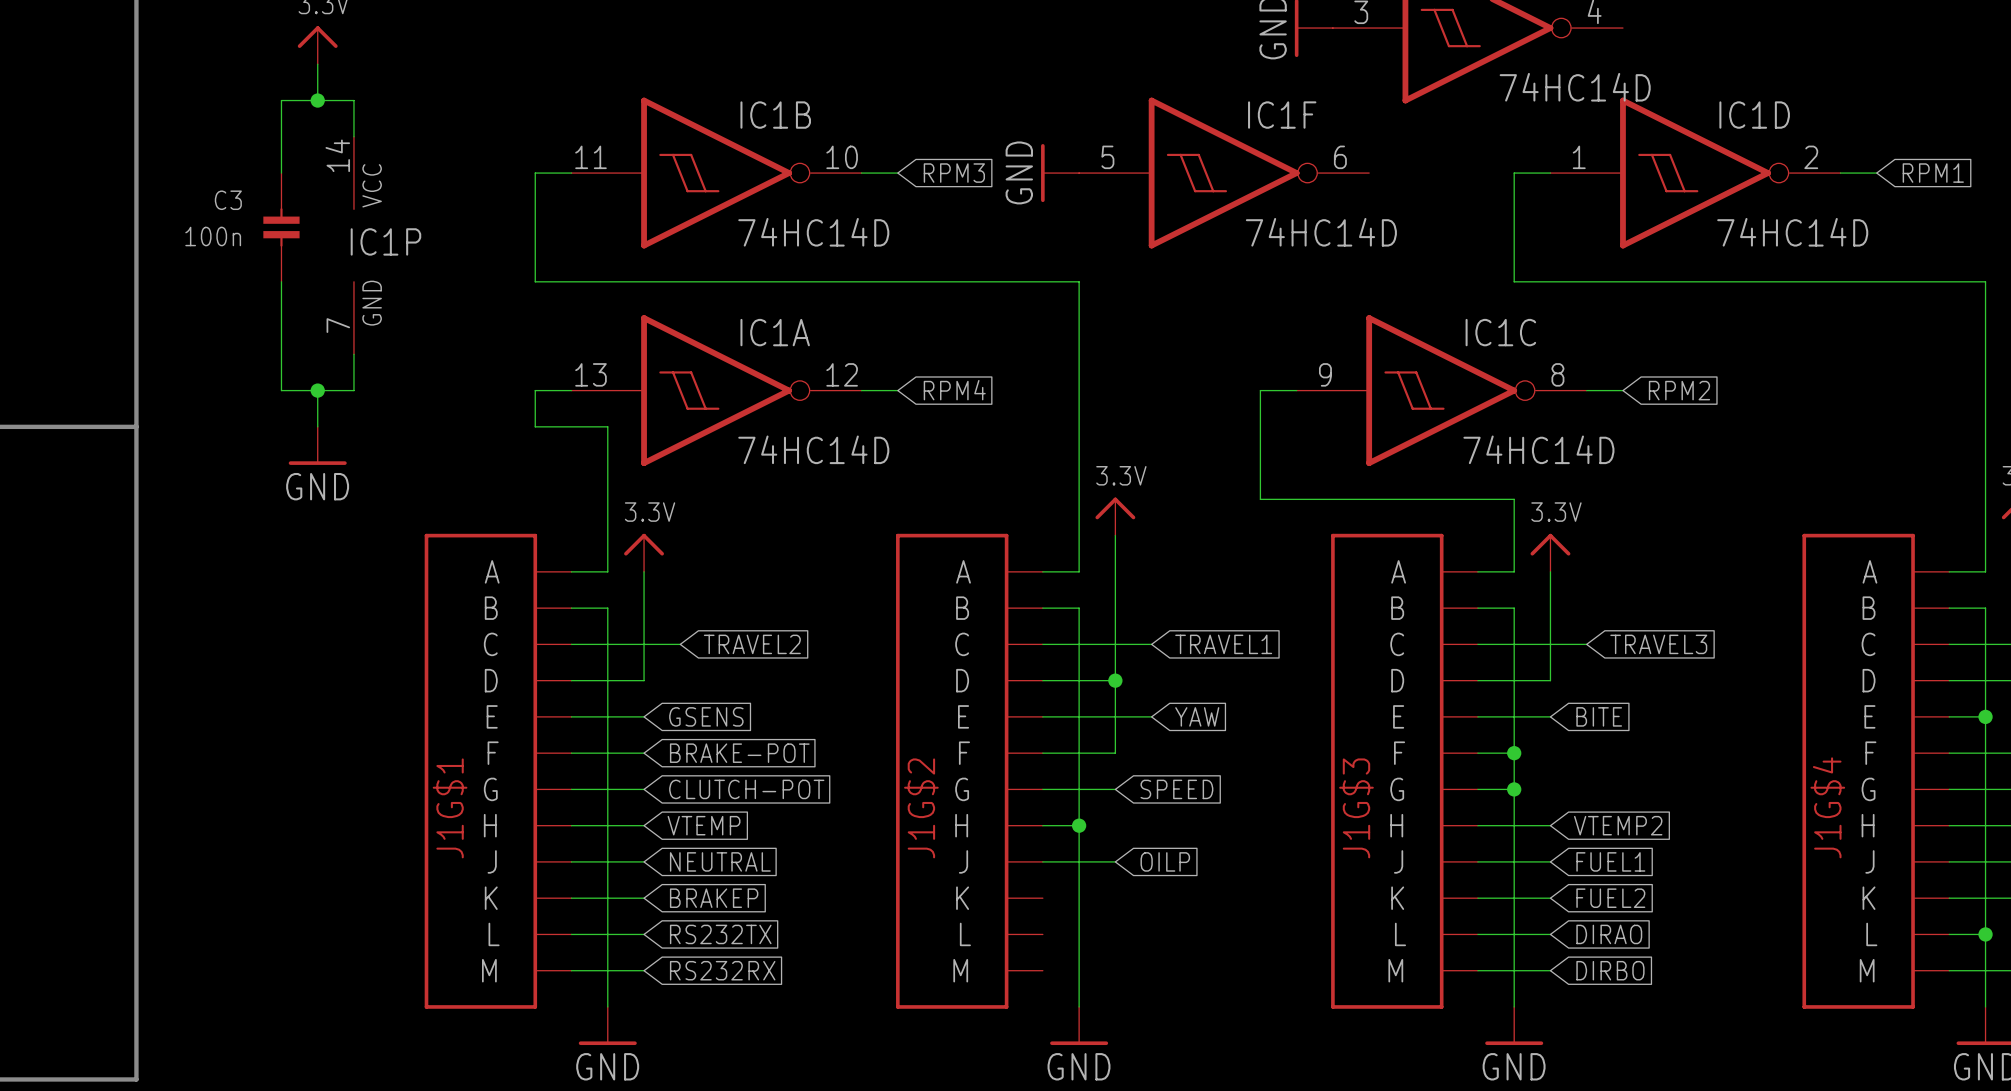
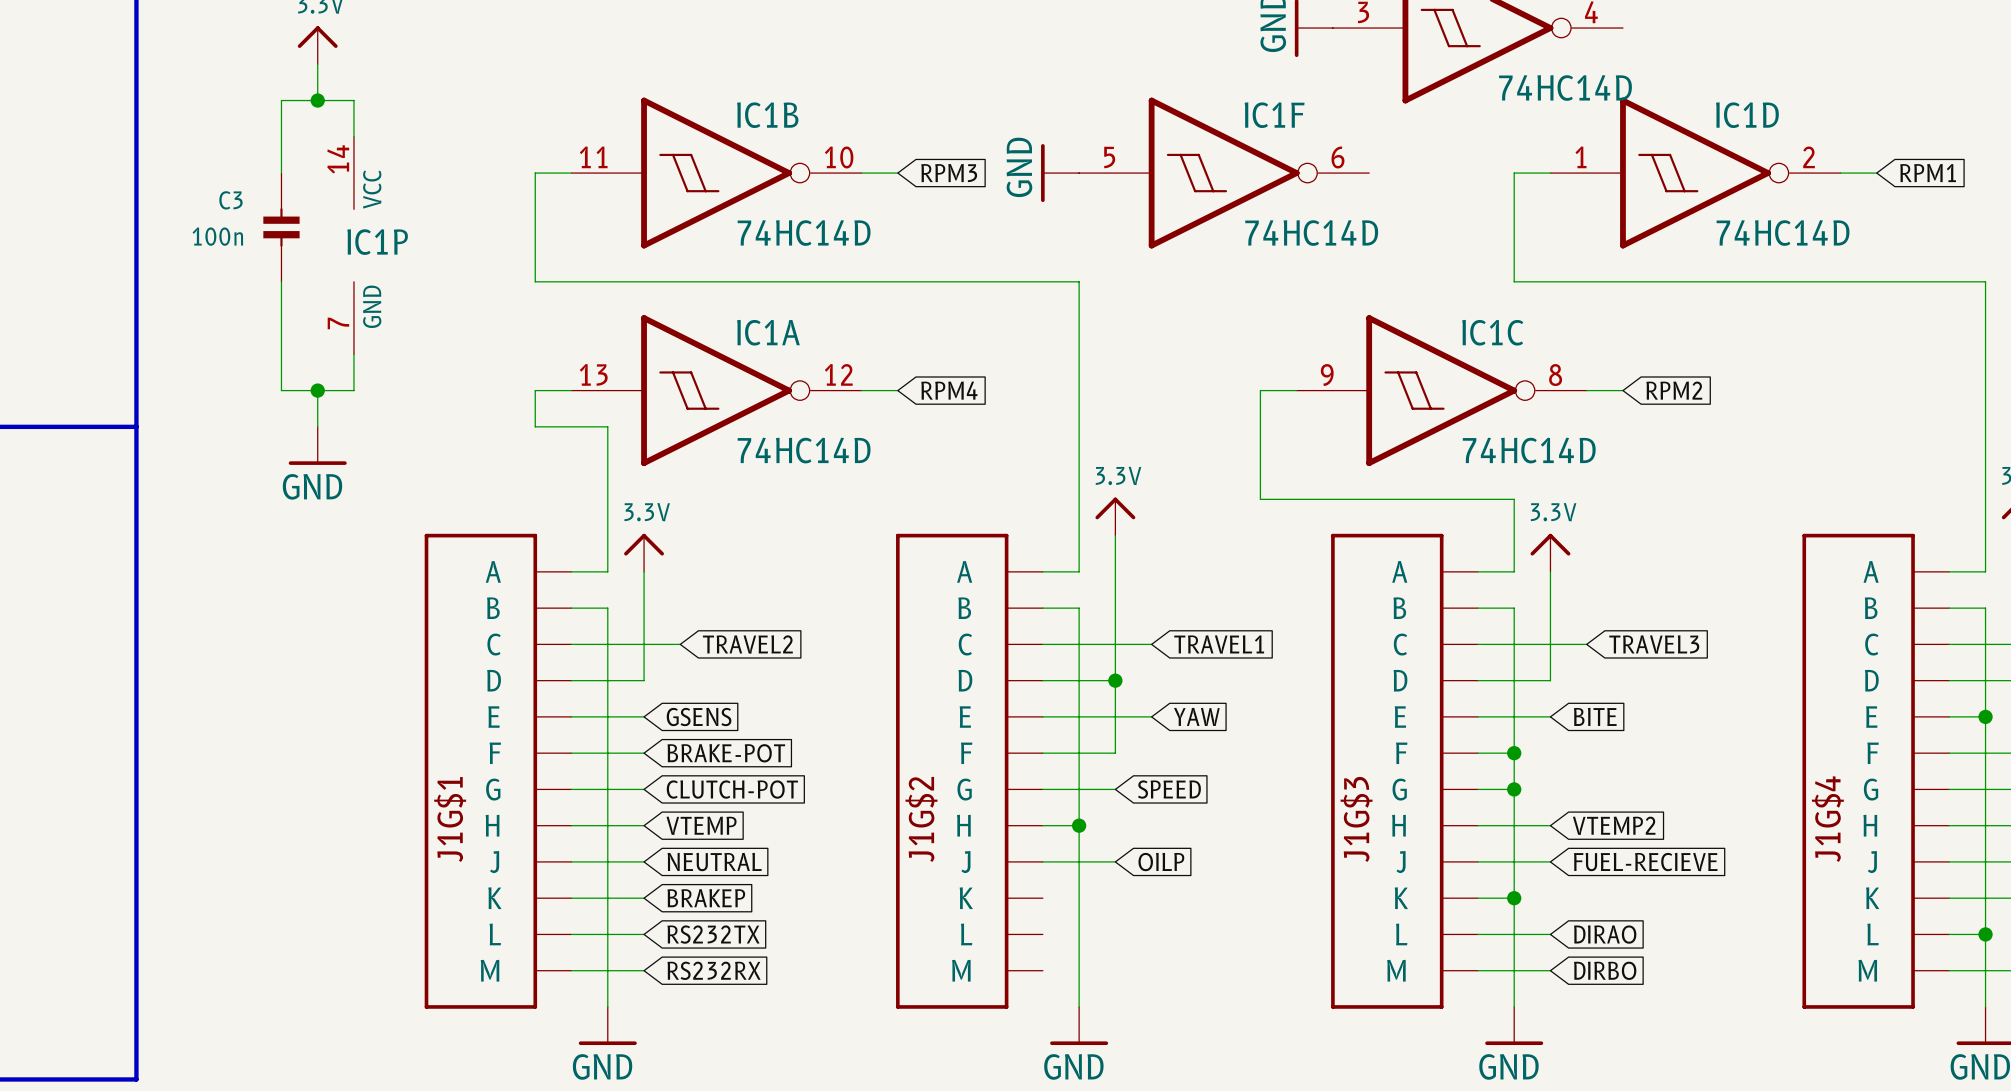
global label: FUEL1 (1610, 861) -> FUEL-RECIEVE (1645, 862)
wire: (1514, 898) (1550, 898) -> none
junction: none -> (1514, 898)
global label: FUEL2 (1610, 898) -> none

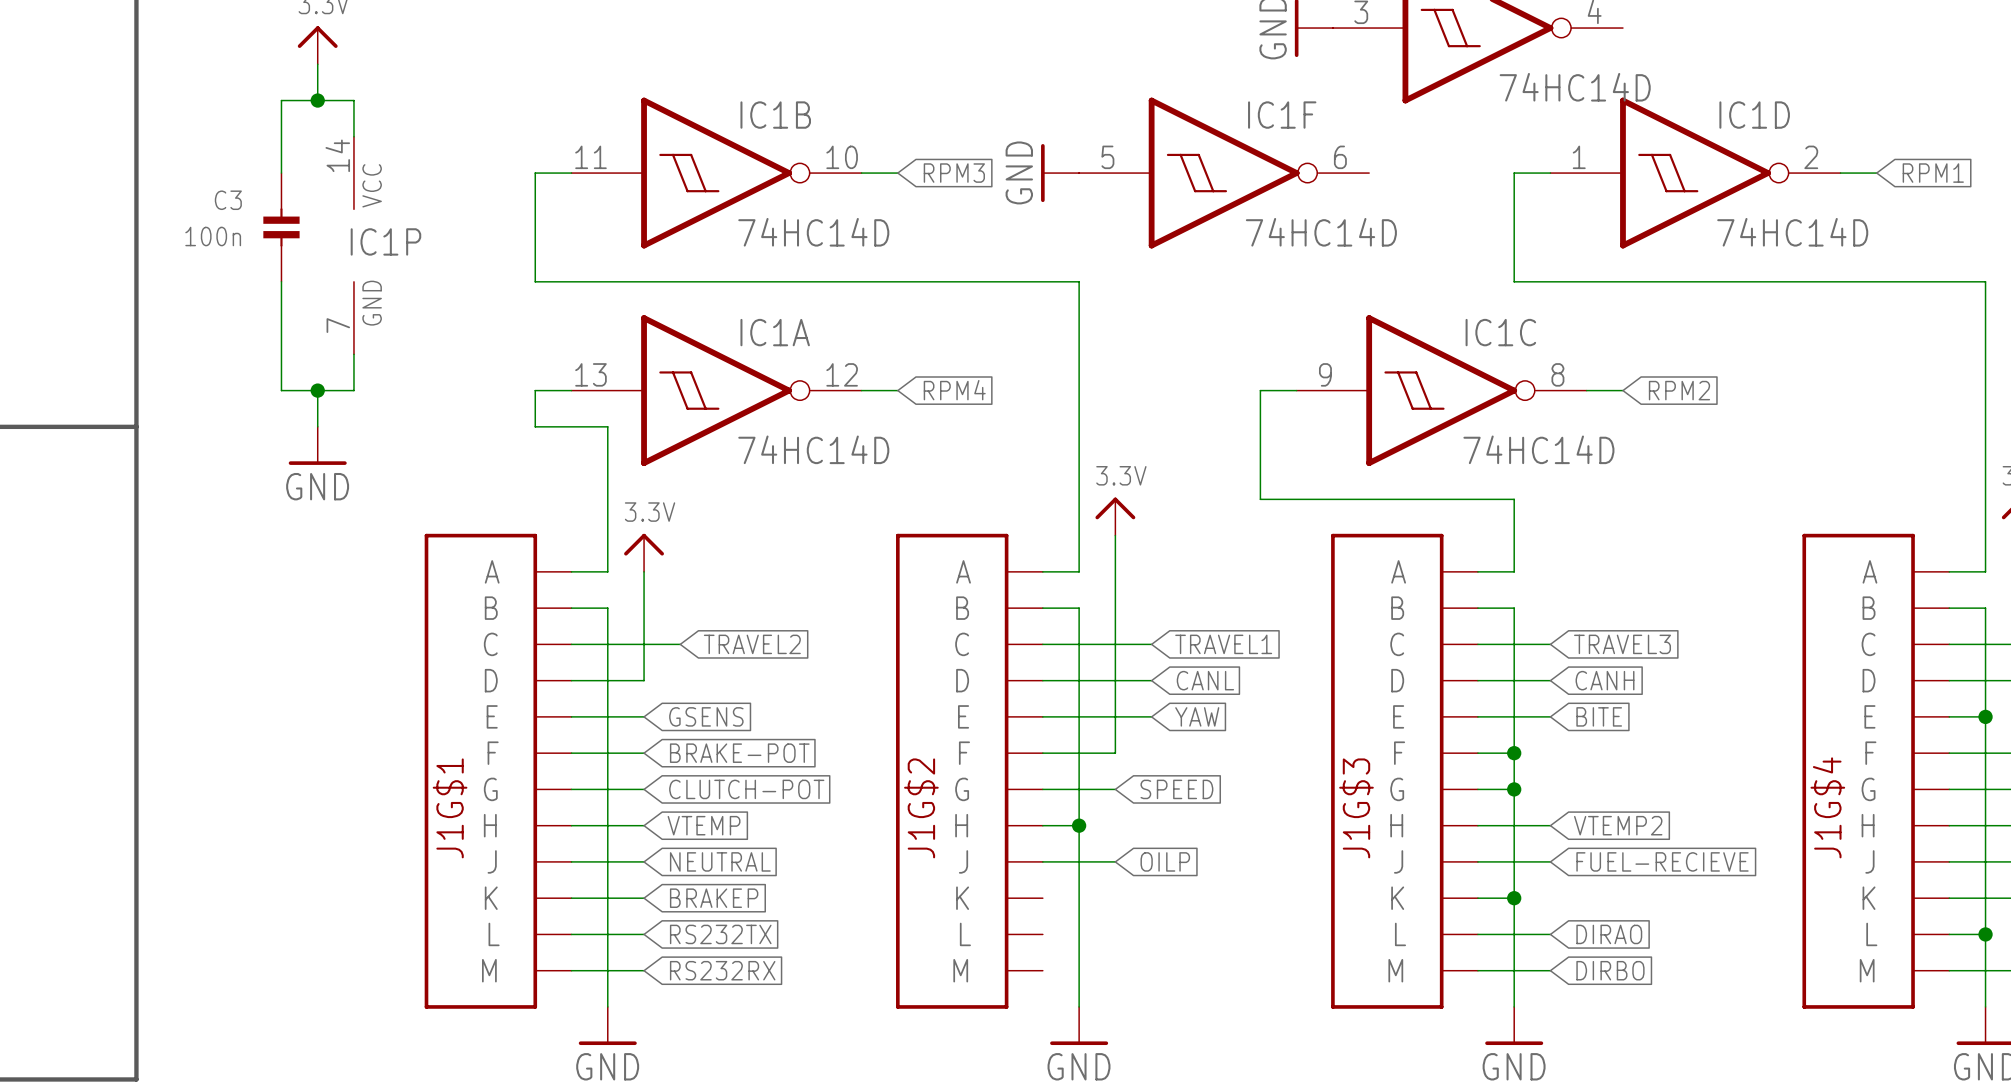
power symbol: 3.3V (1550, 552) -> none
wire: (1550, 571) (1550, 680) -> none
wire: (1550, 644) (1586, 644) -> none
global label position: TRAVEL3 (1654, 644) -> TRAVEL3 (1622, 644)
wire: none -> (1115, 680) (1151, 680)
junction: (1115, 680) -> none
global label: none -> CANL (1205, 680)
global label: none -> CANH (1605, 680)

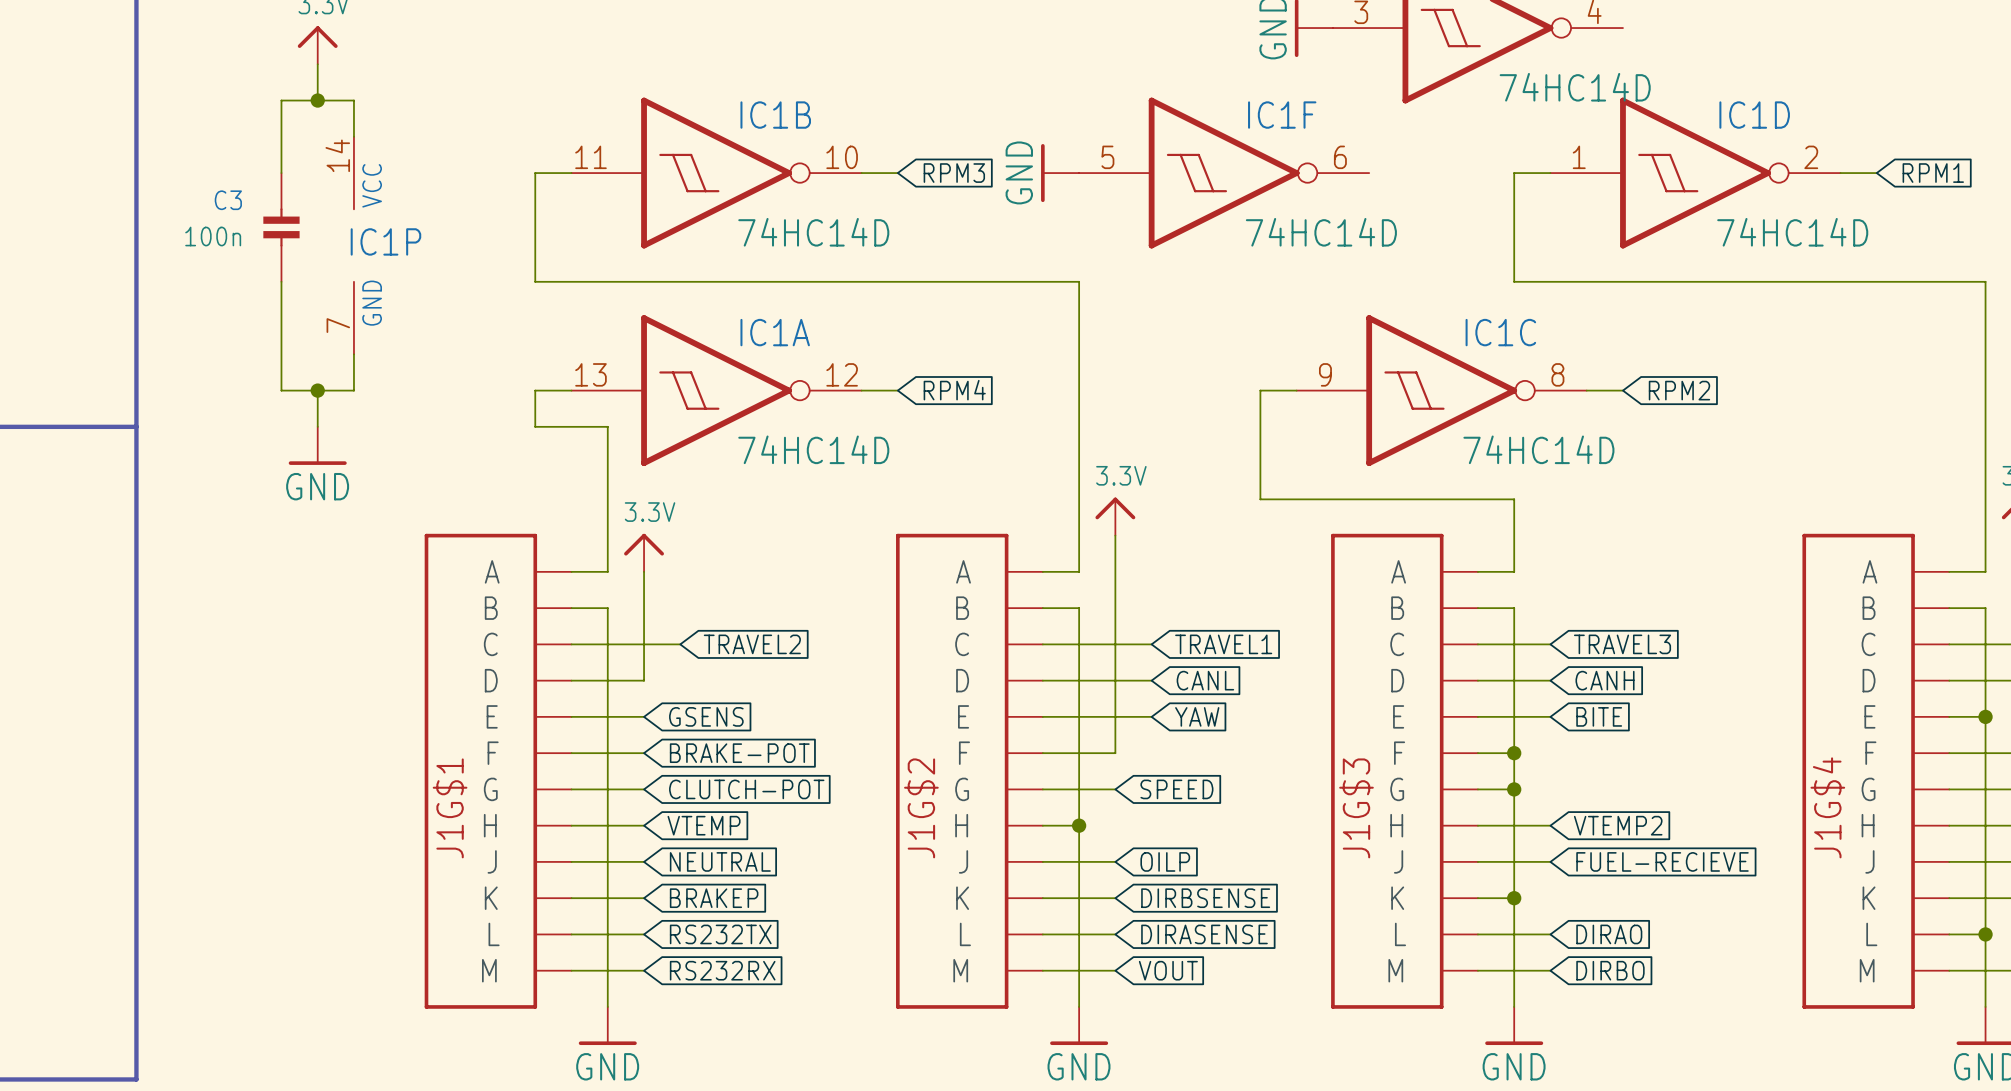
wire: none -> (1042, 898) (1115, 898)
global label: none -> DIRBSENSE (1205, 898)
wire: none -> (1042, 934) (1115, 934)
global label: none -> DIRASENSE (1204, 934)
wire: none -> (1042, 970) (1115, 970)
global label: none -> VOUT (1168, 970)

